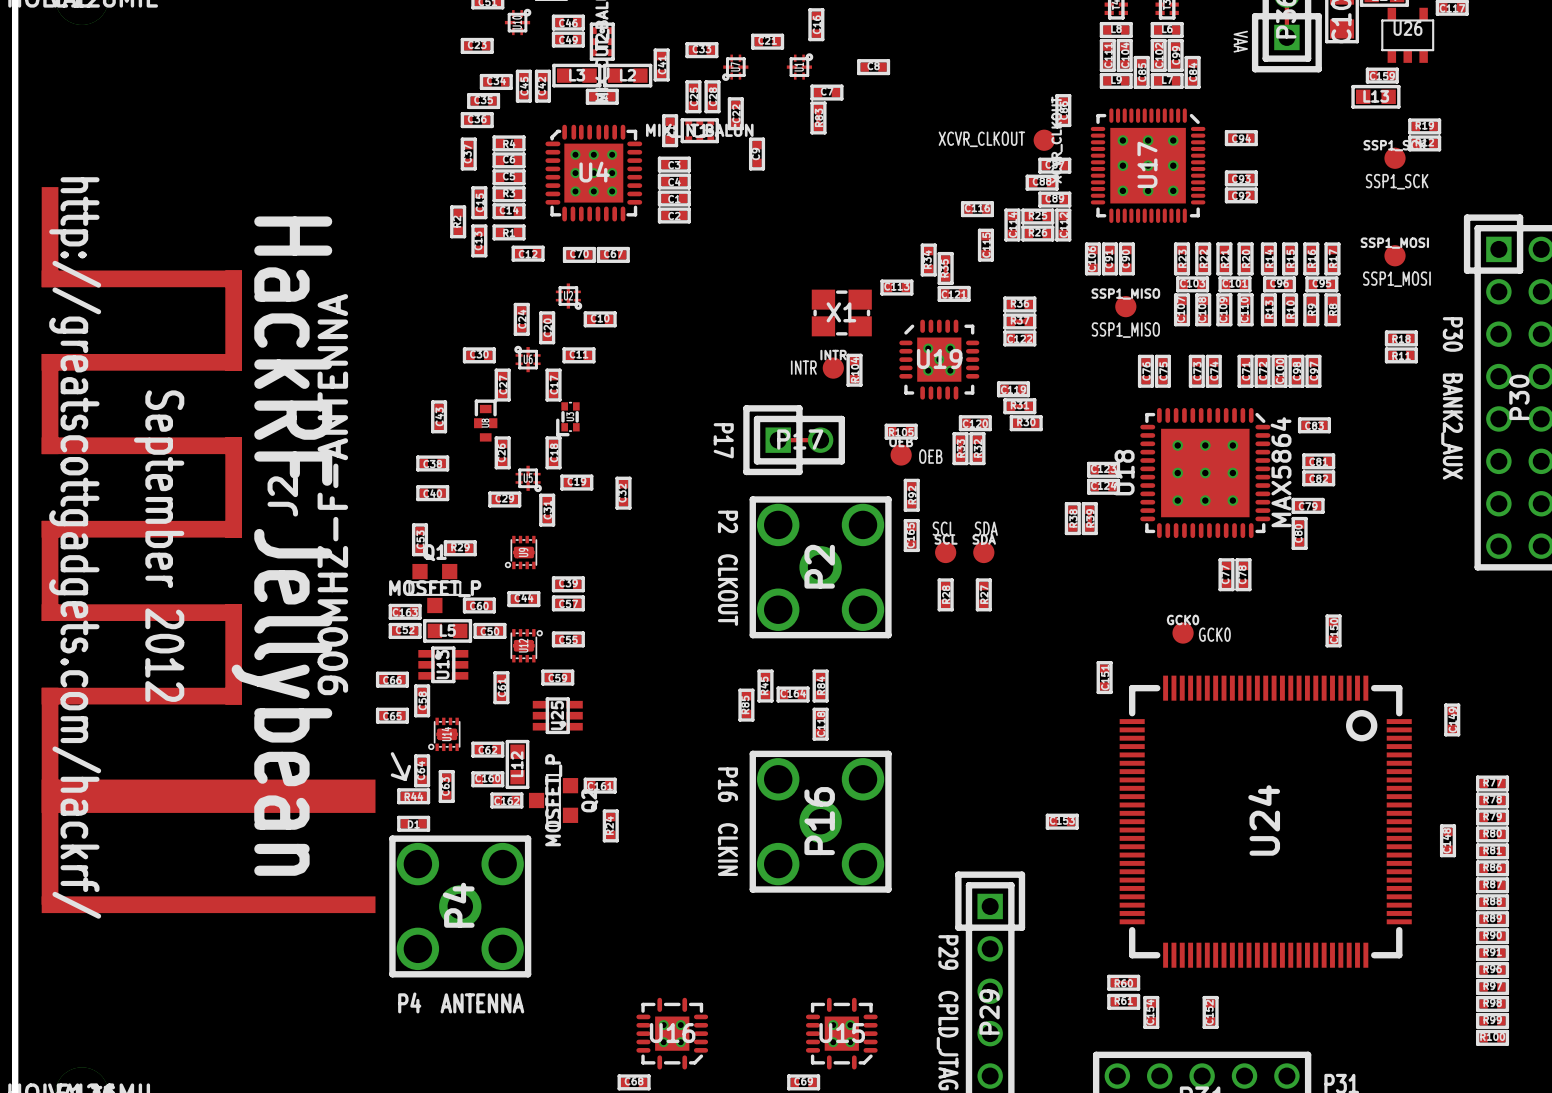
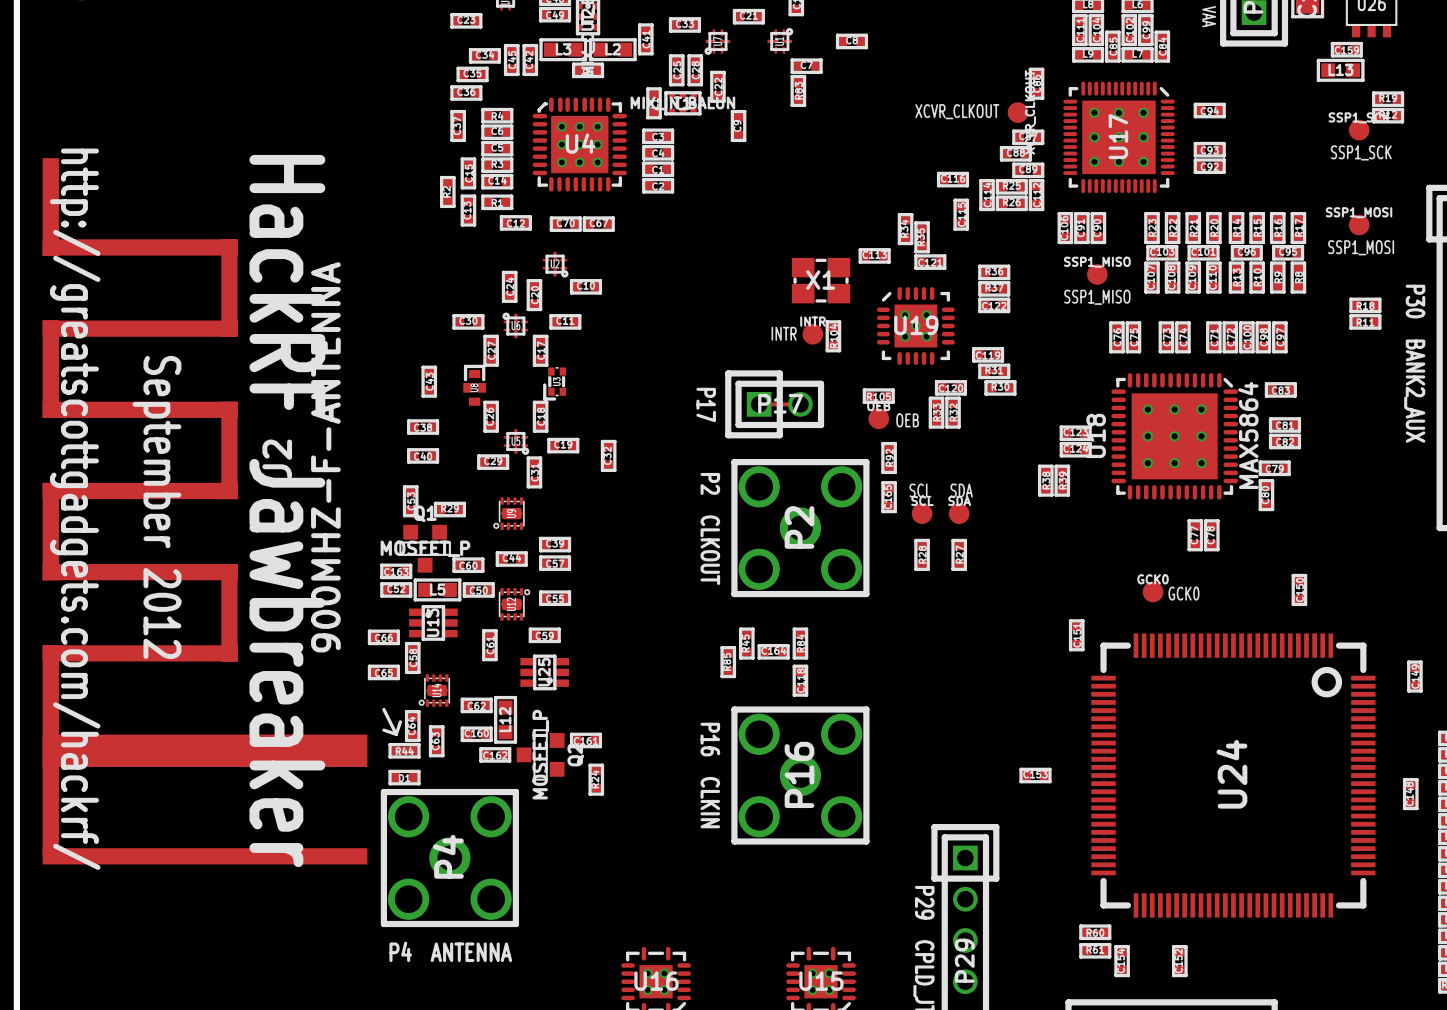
text: HackRF Jellybean (281, 546) -> HackRF Jawbreaker (287, 511)

